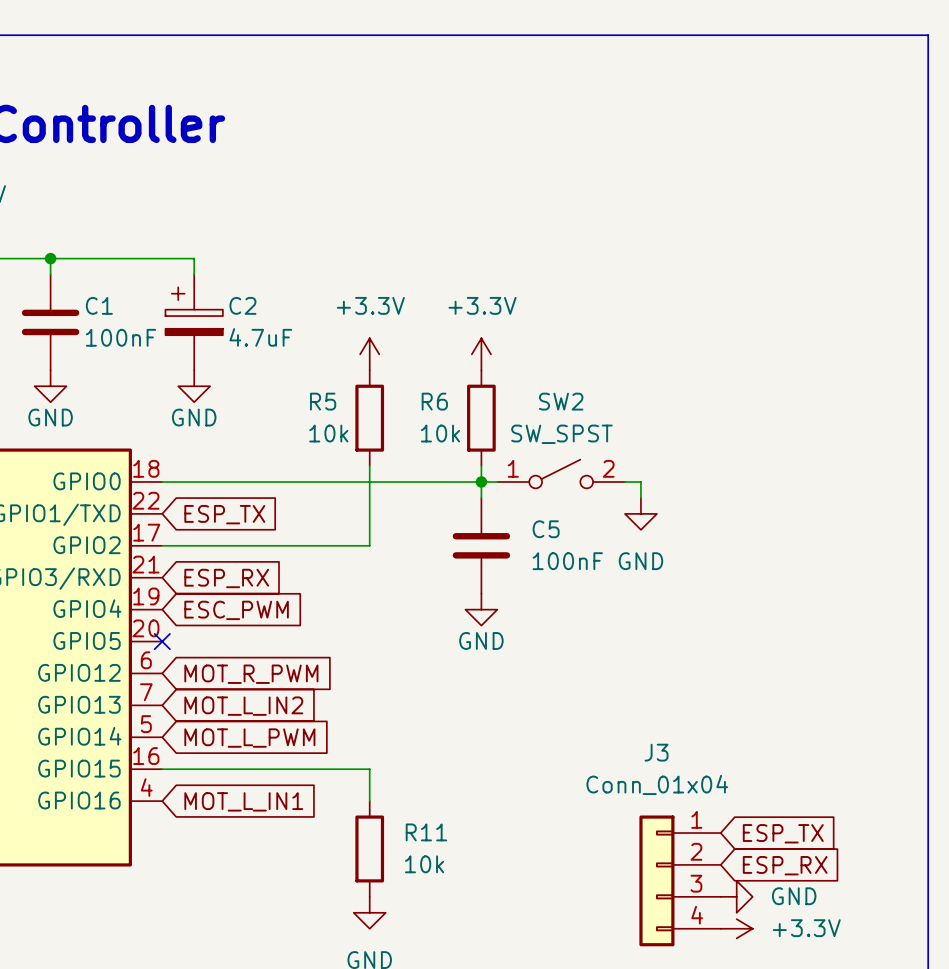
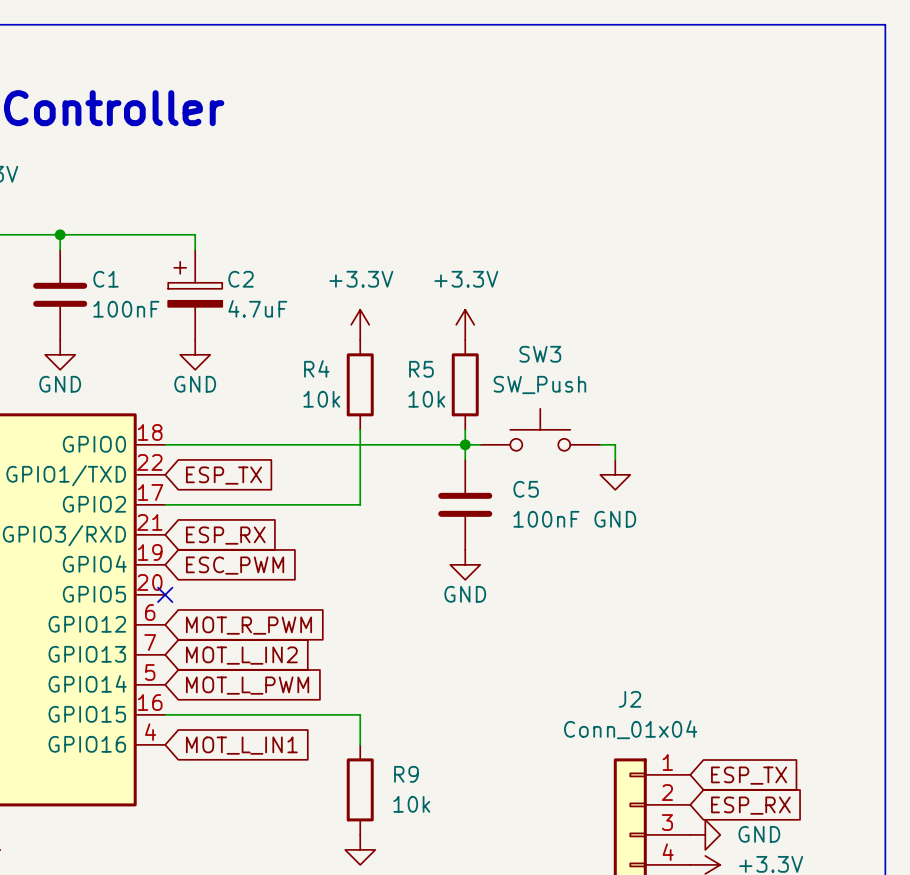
R5 name: R5 (323, 401) -> R4 (316, 368)
R6 name: R6 (434, 401) -> R5 (421, 369)
SW3: none -> SW_Push (540, 429)
SW2: SW_SPST (561, 474) -> none
J3 name: J3 (656, 752) -> J2 (629, 699)
R11 name: R11 (426, 832) -> R9 (406, 774)

